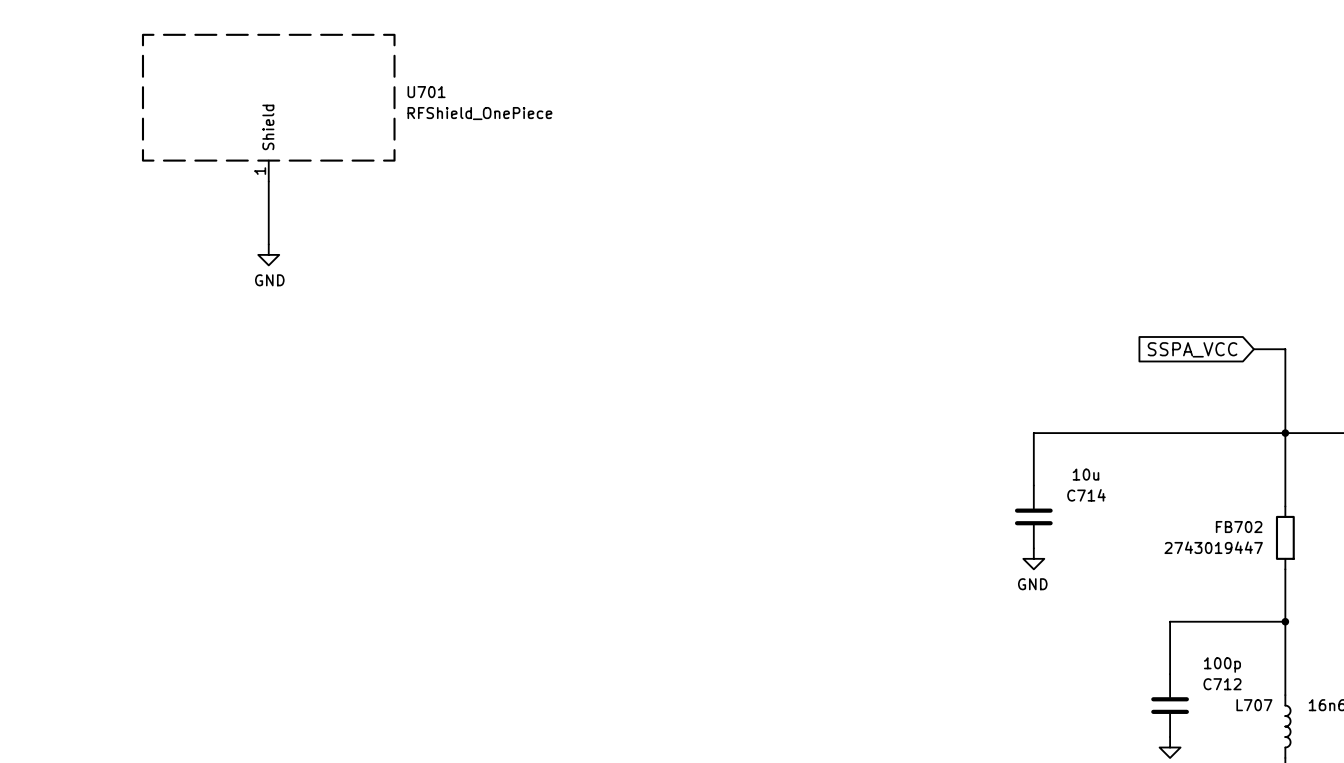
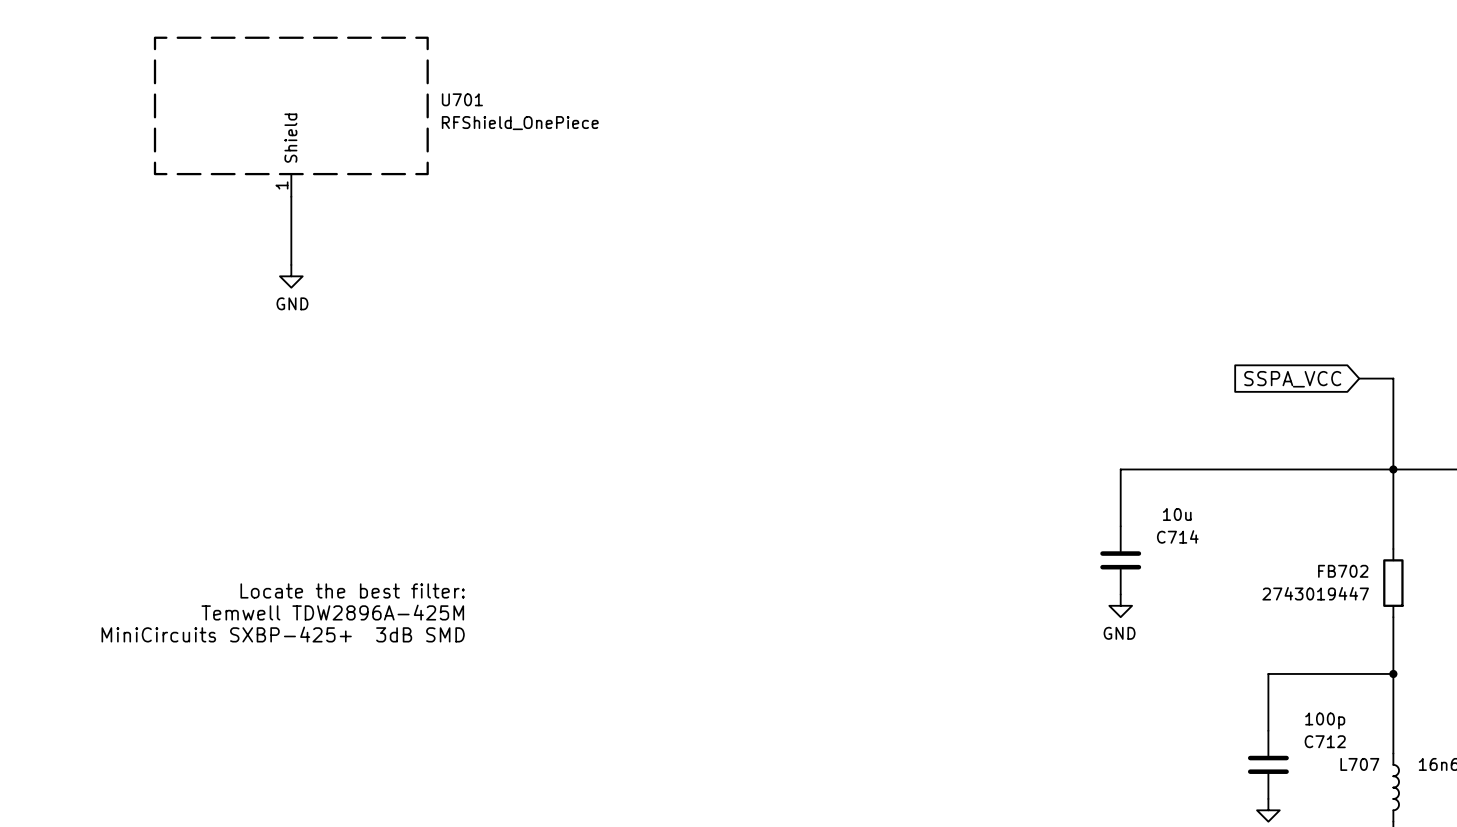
text: none -> Locate the best filter: (352, 590)
text: none -> Temwell TDW2896A-425M (332, 612)
text: none -> MiniCircuits SXBP-425+ 3dB SMD (283, 634)

